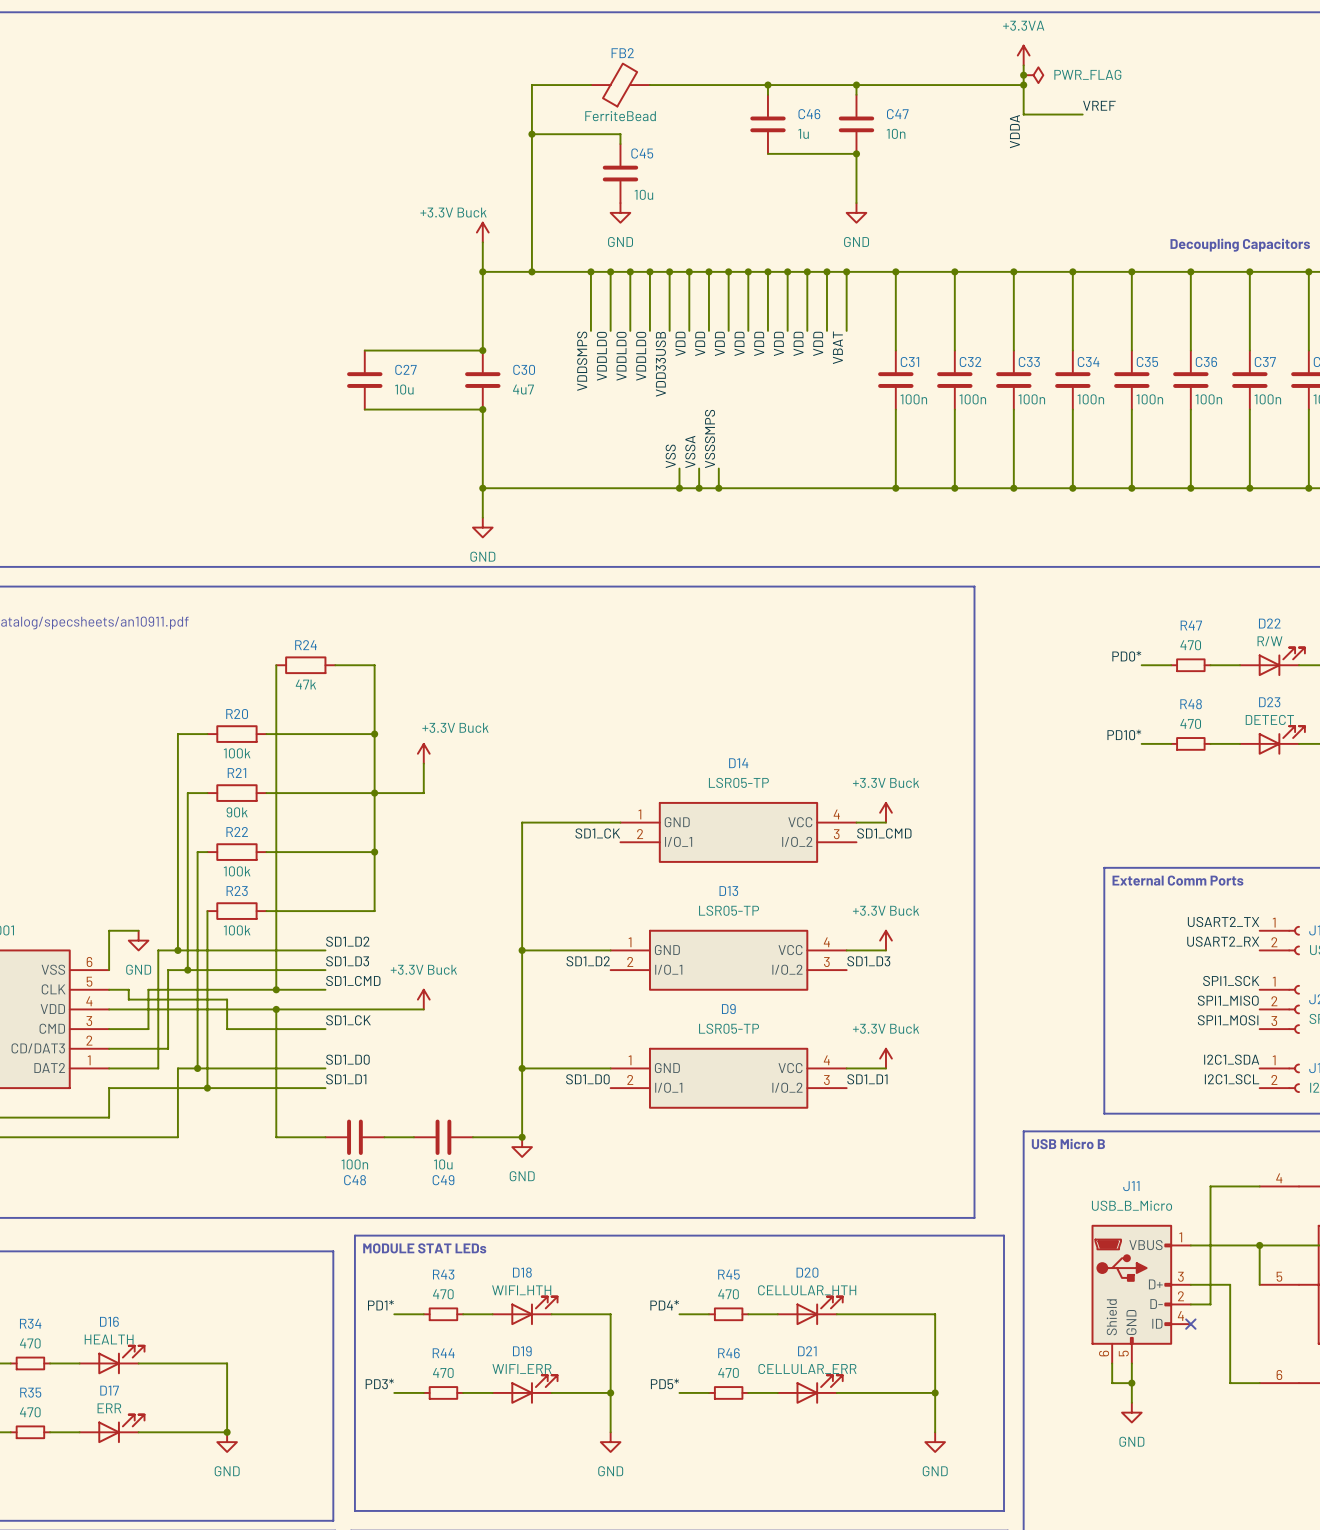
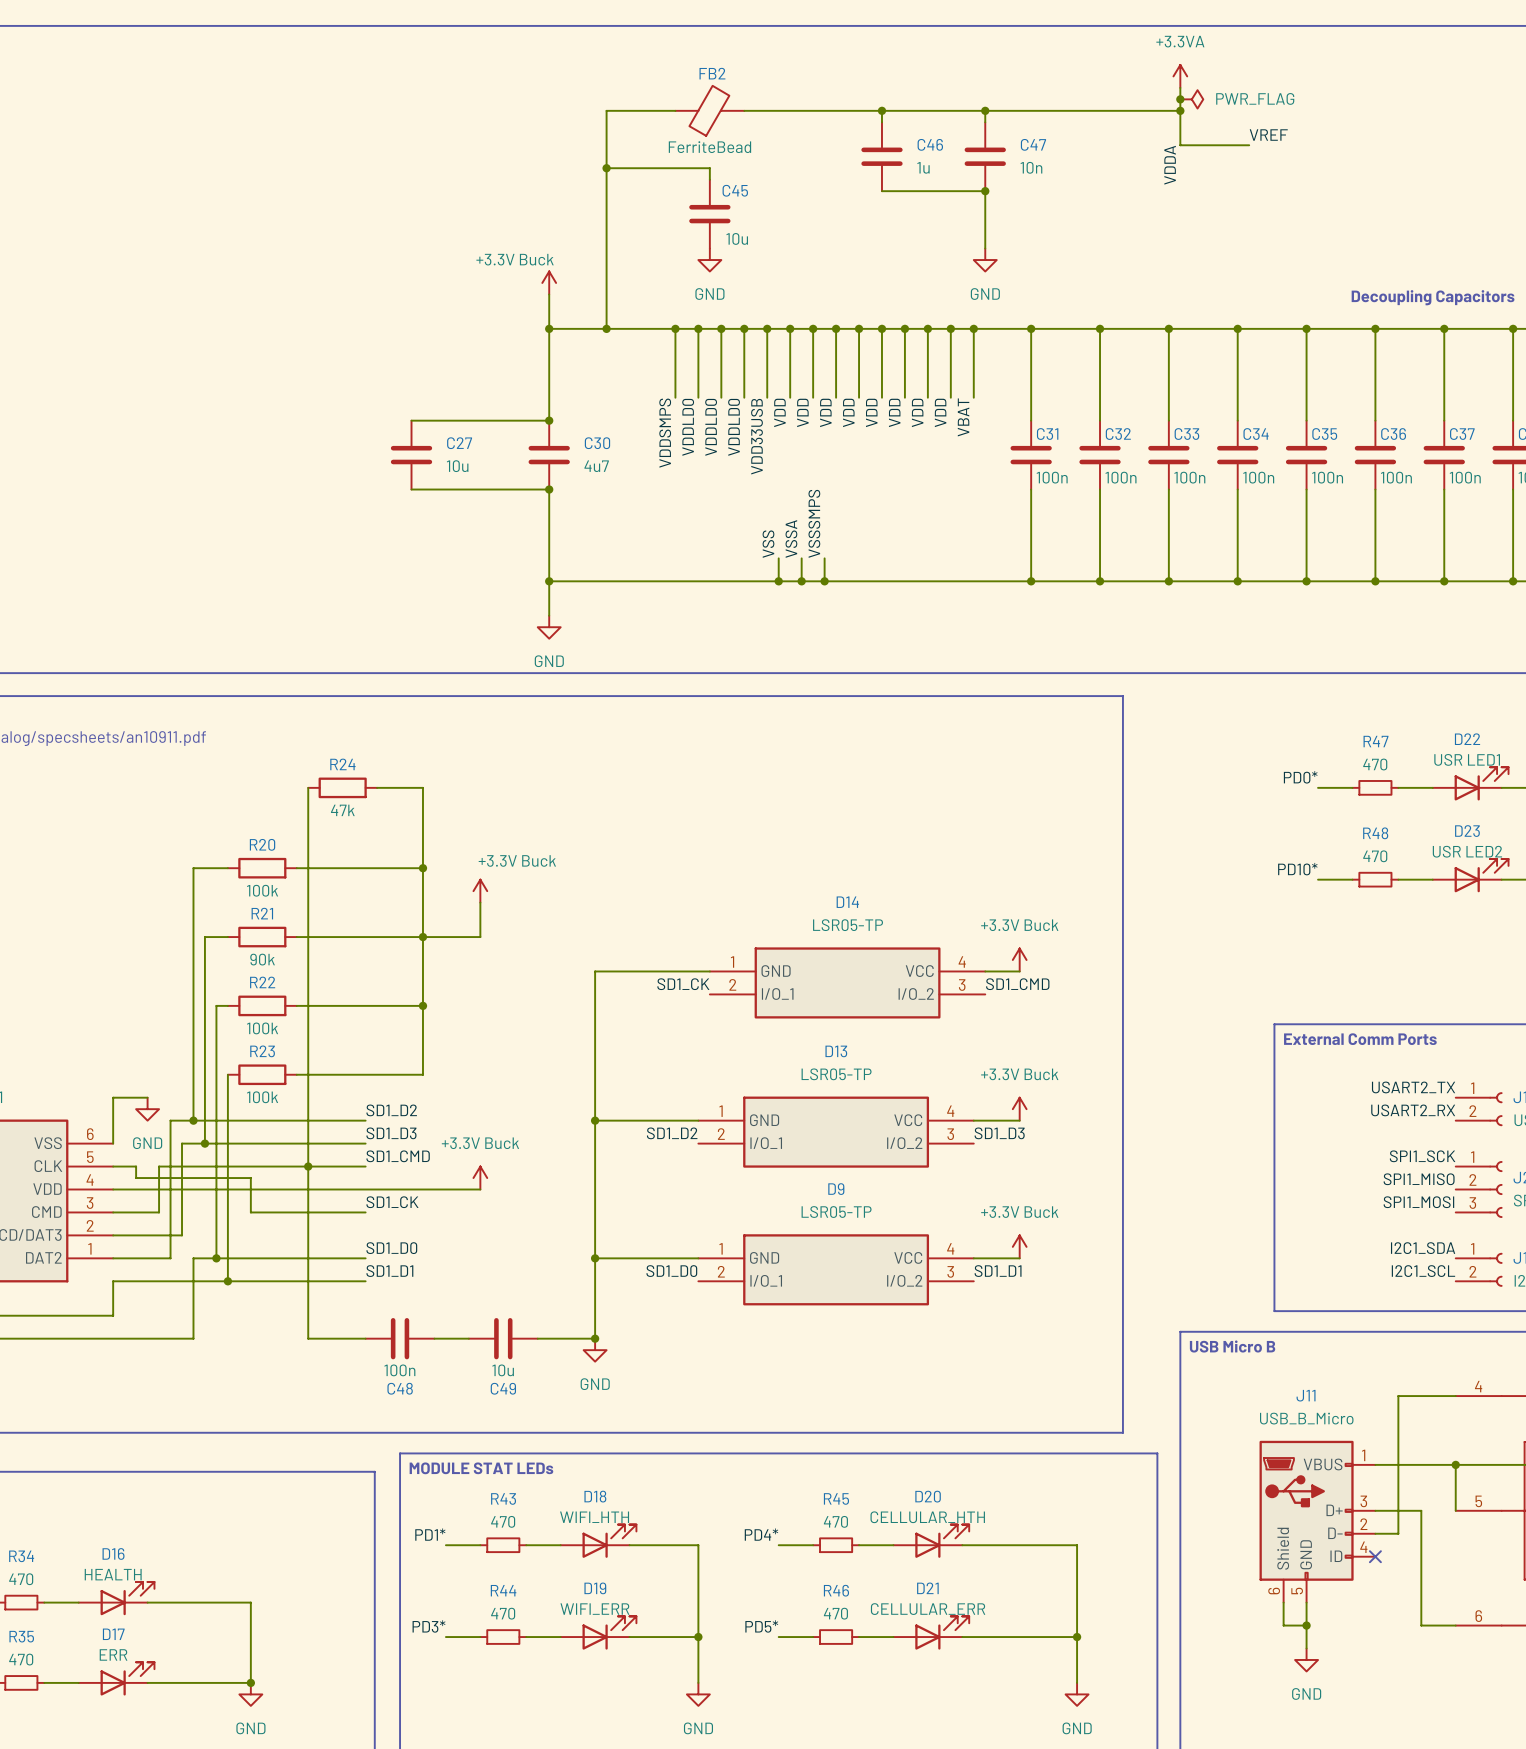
D22 value: R/W (1269, 641) -> USR LED1 (1467, 759)
D23 value: DETECT (1269, 719) -> USR LED2 (1467, 851)
wire: none -> (308, 1166) (308, 1189)
junction: (276, 1009) -> none

